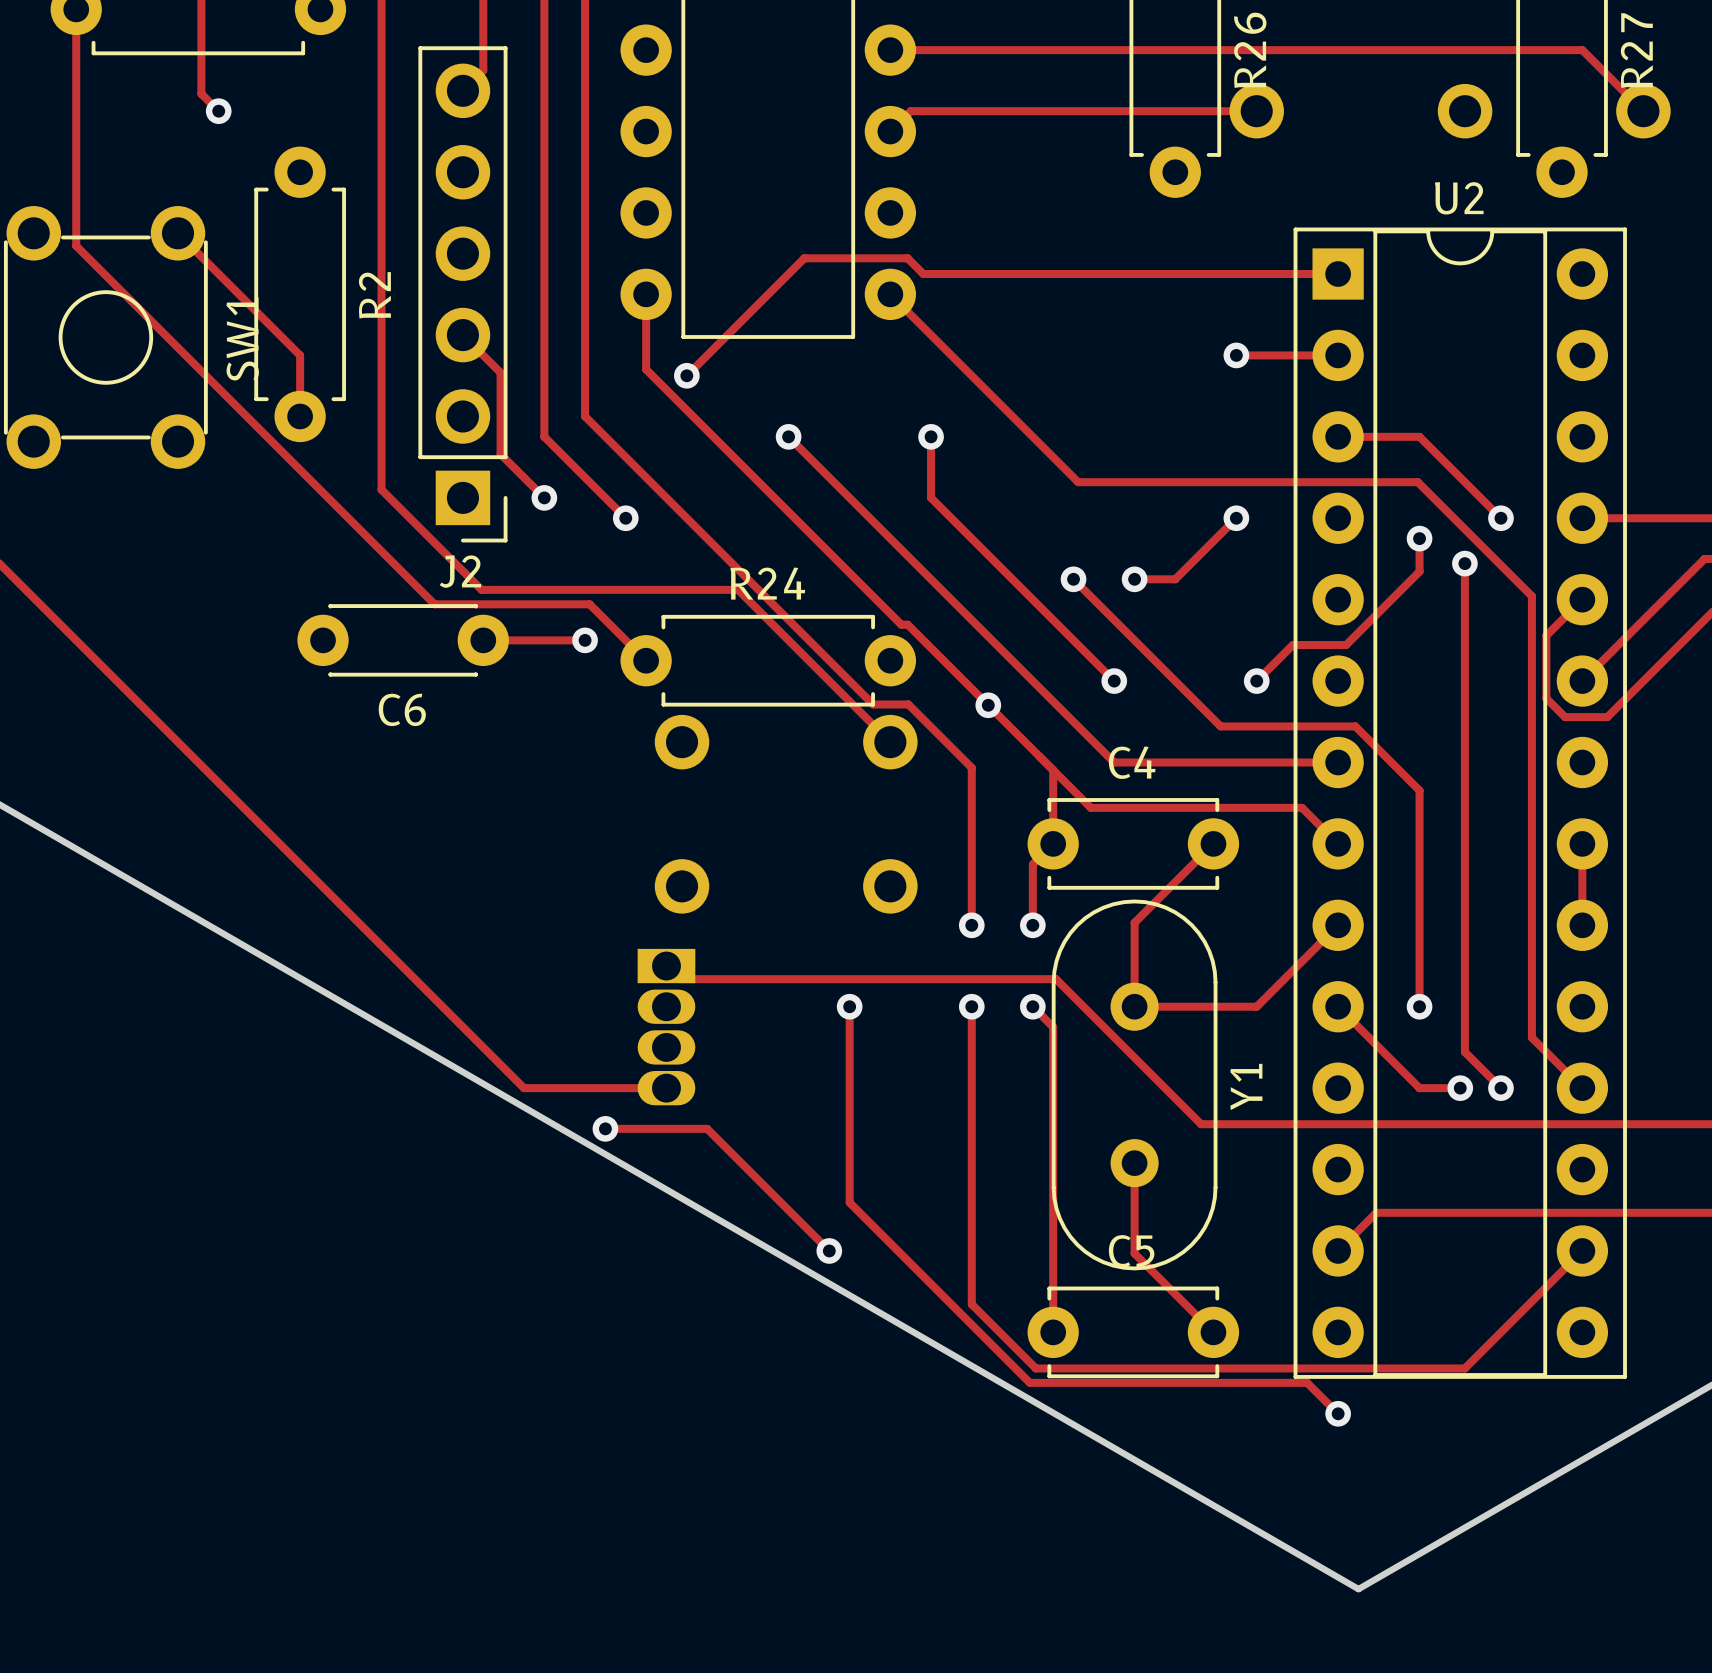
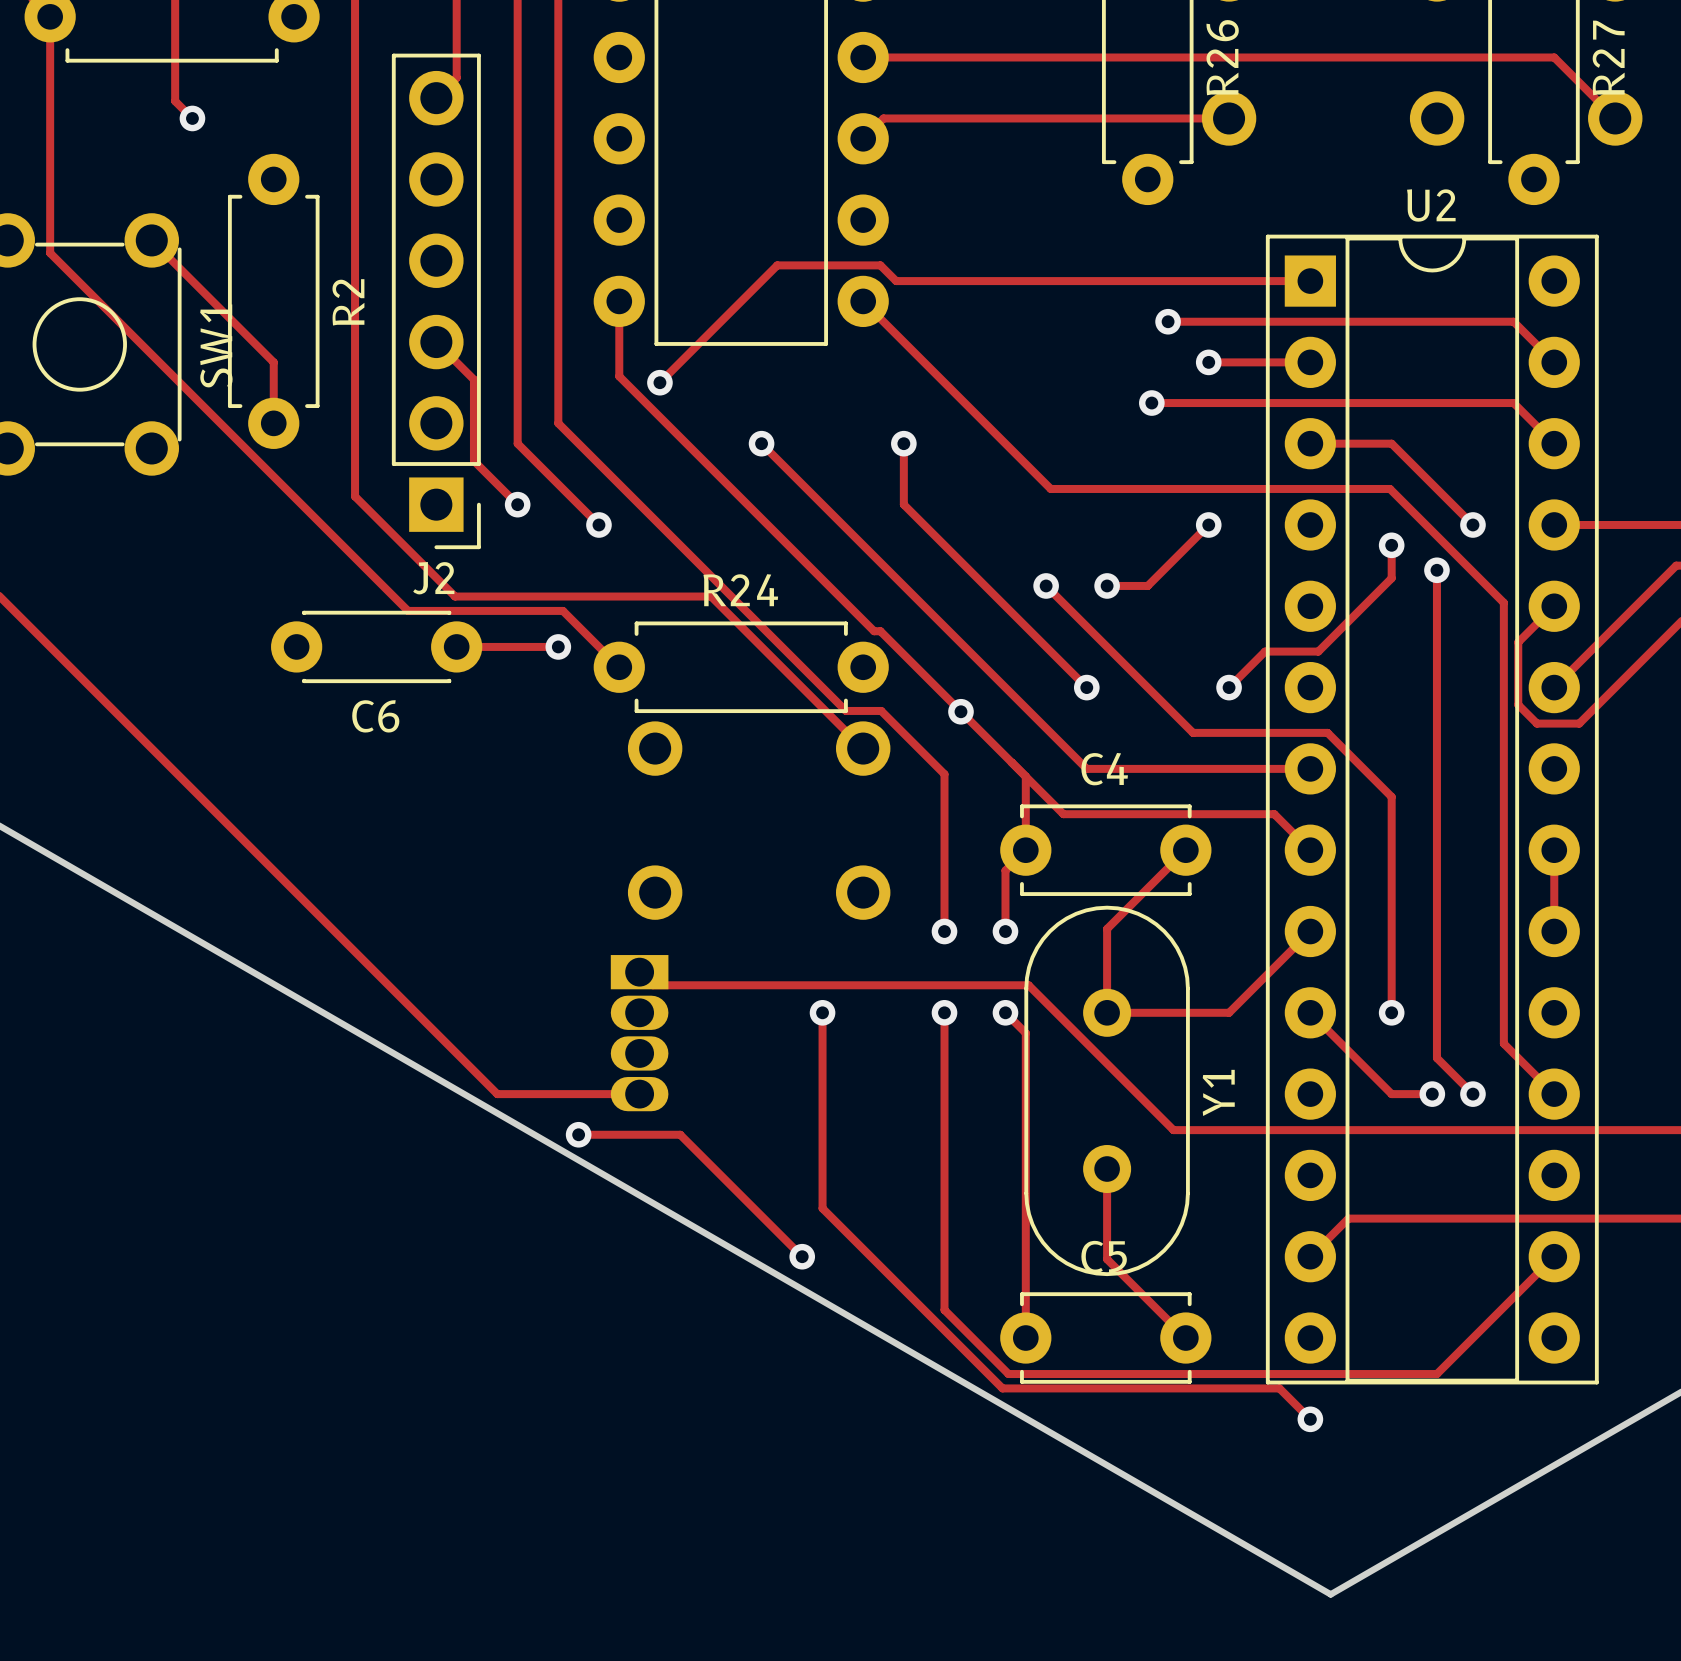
track: none -> (1168, 321) (1513, 321) (1554, 362)
via: none -> (1168, 321)
track: none -> (1151, 403) (1513, 403) (1554, 443)
via: none -> (1151, 403)

